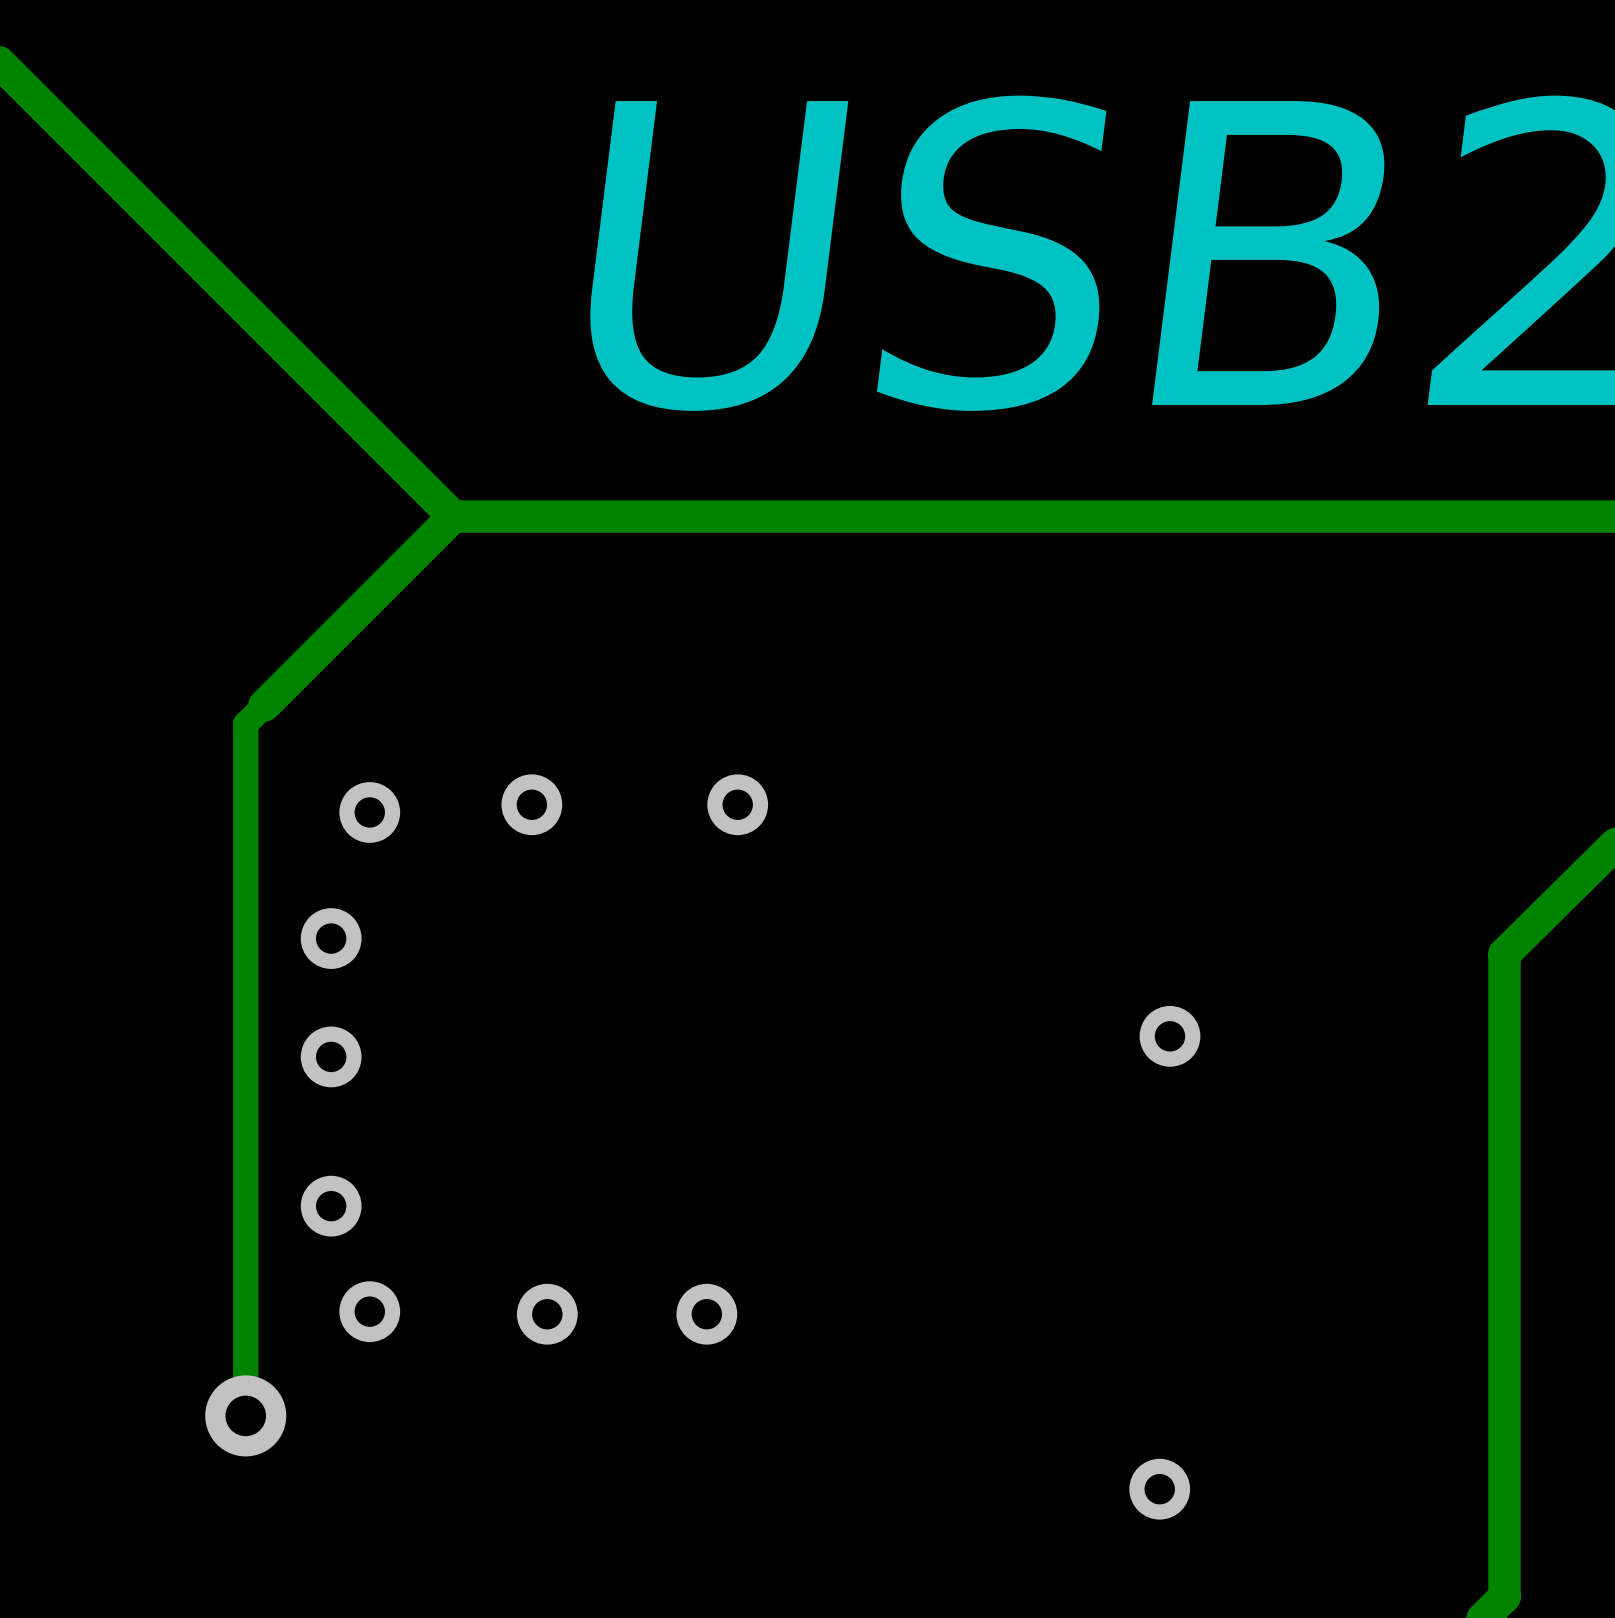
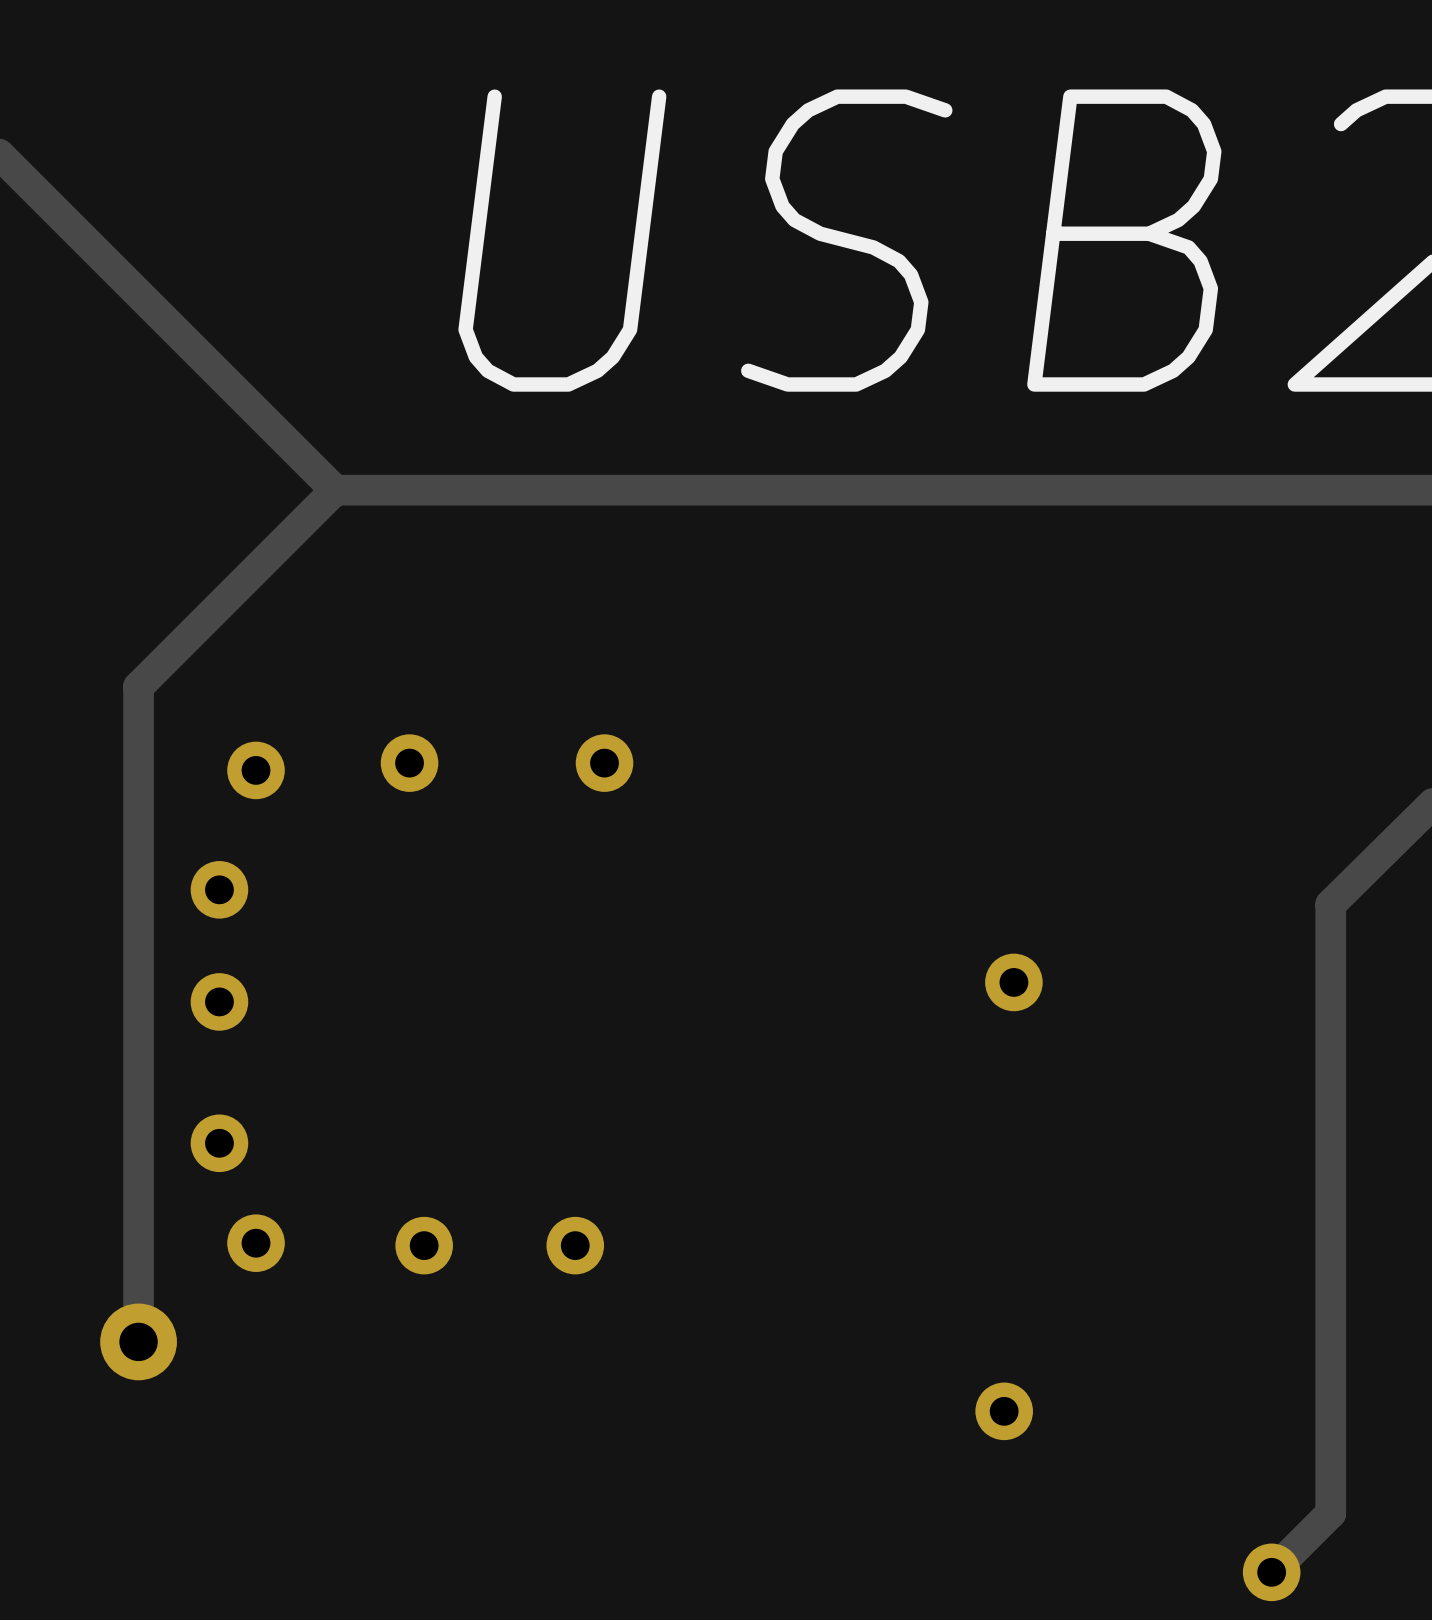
track width: thin (264, 705) (245, 724) (245, 1415) -> thick (156, 669) (138, 686) (138, 1341)

